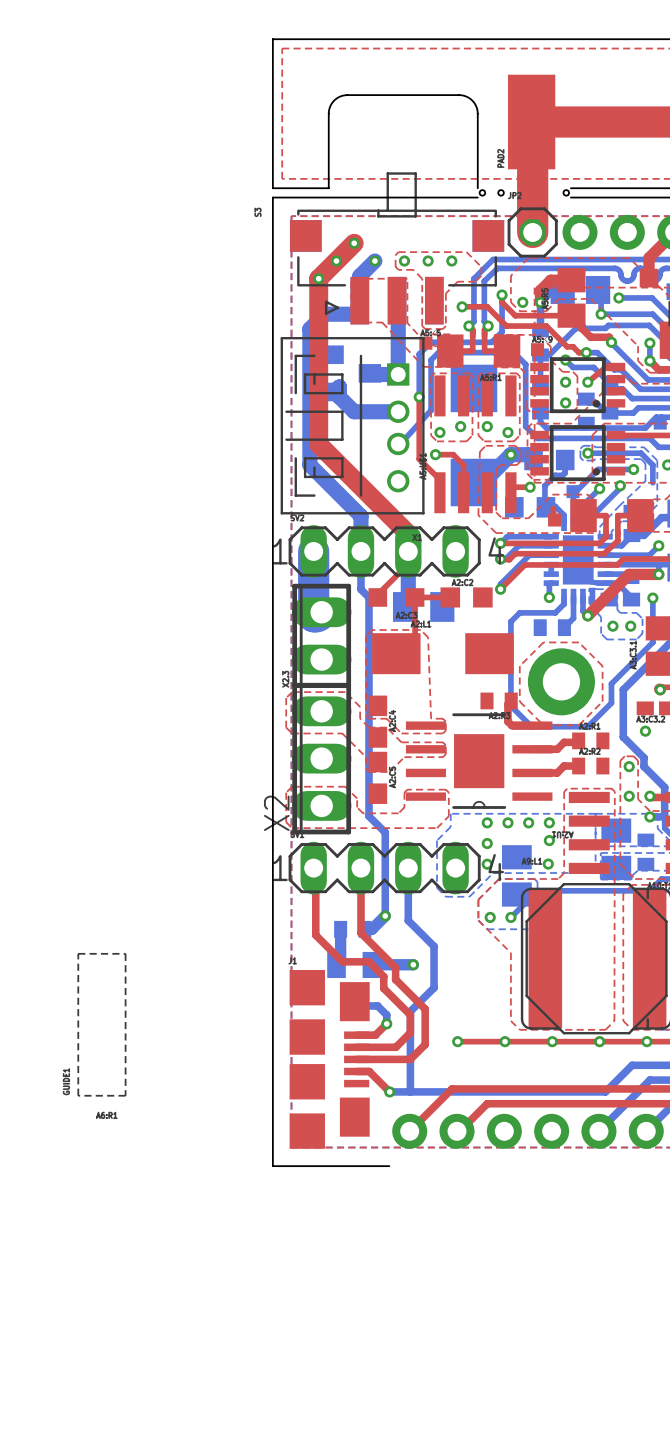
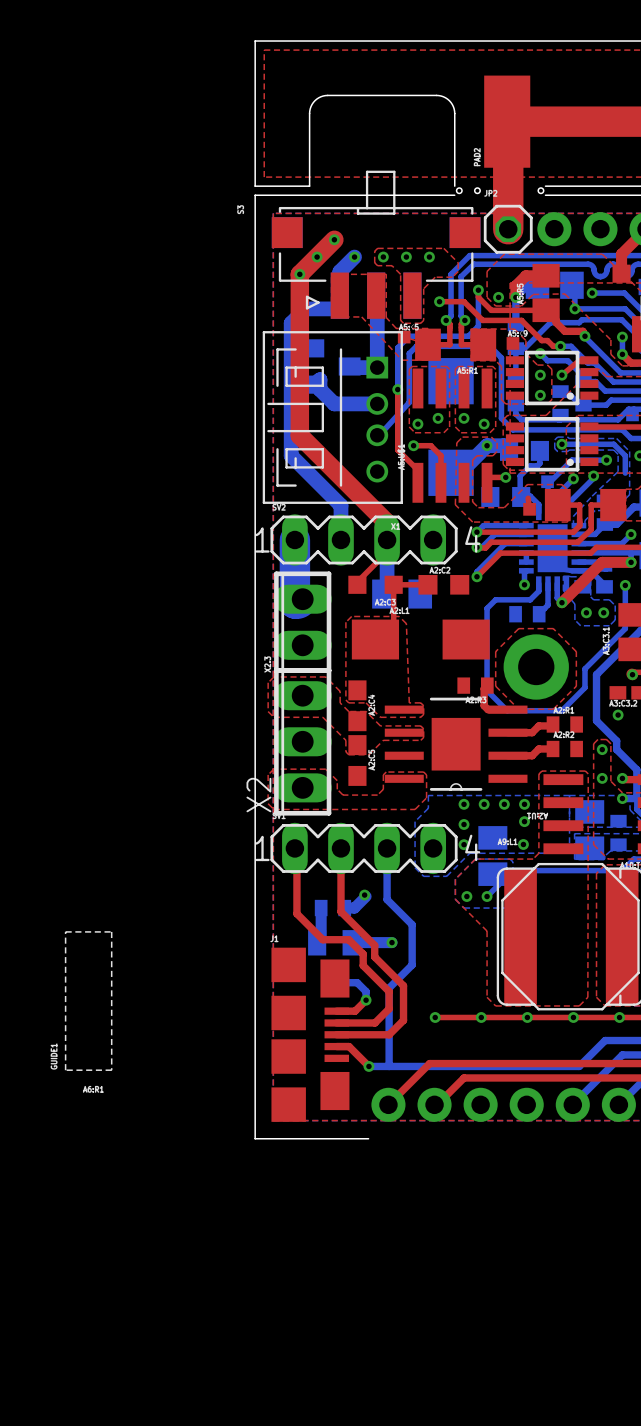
bottom track: (360, 551) (360, 589) (368, 597) (368, 816) (385, 832) (385, 915) (371, 929) -> (366, 896) (354, 908) (351, 908)

